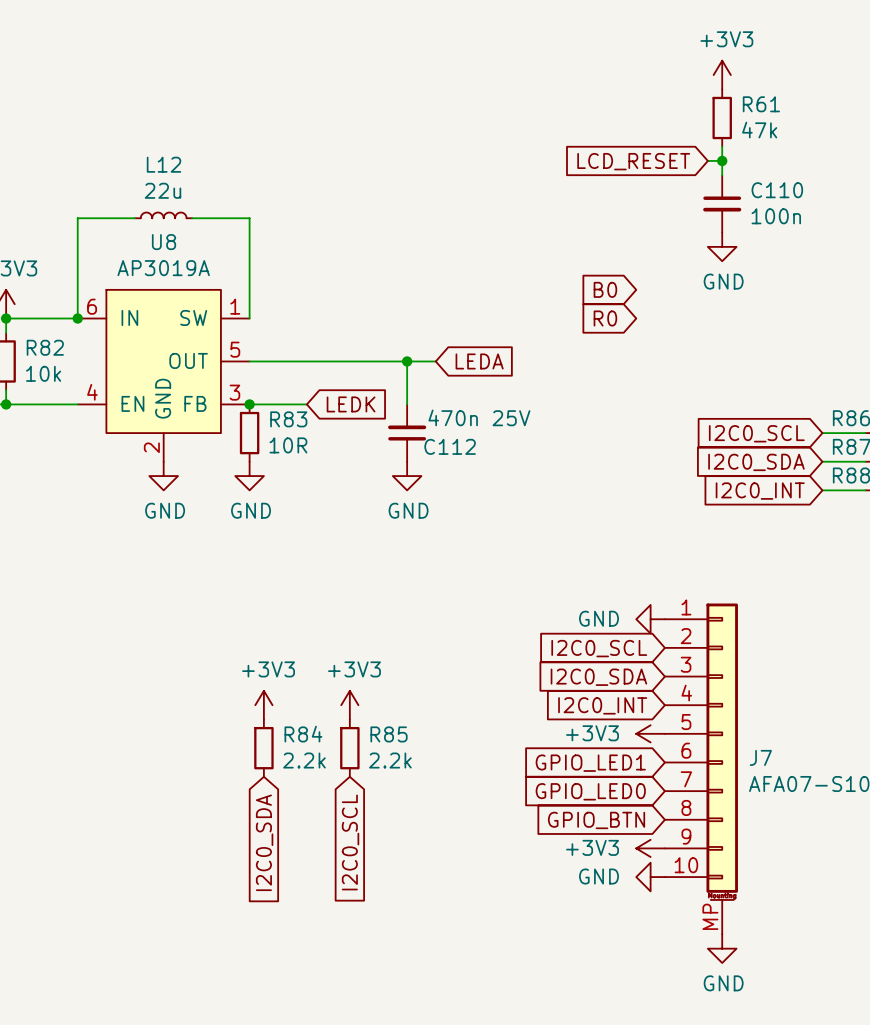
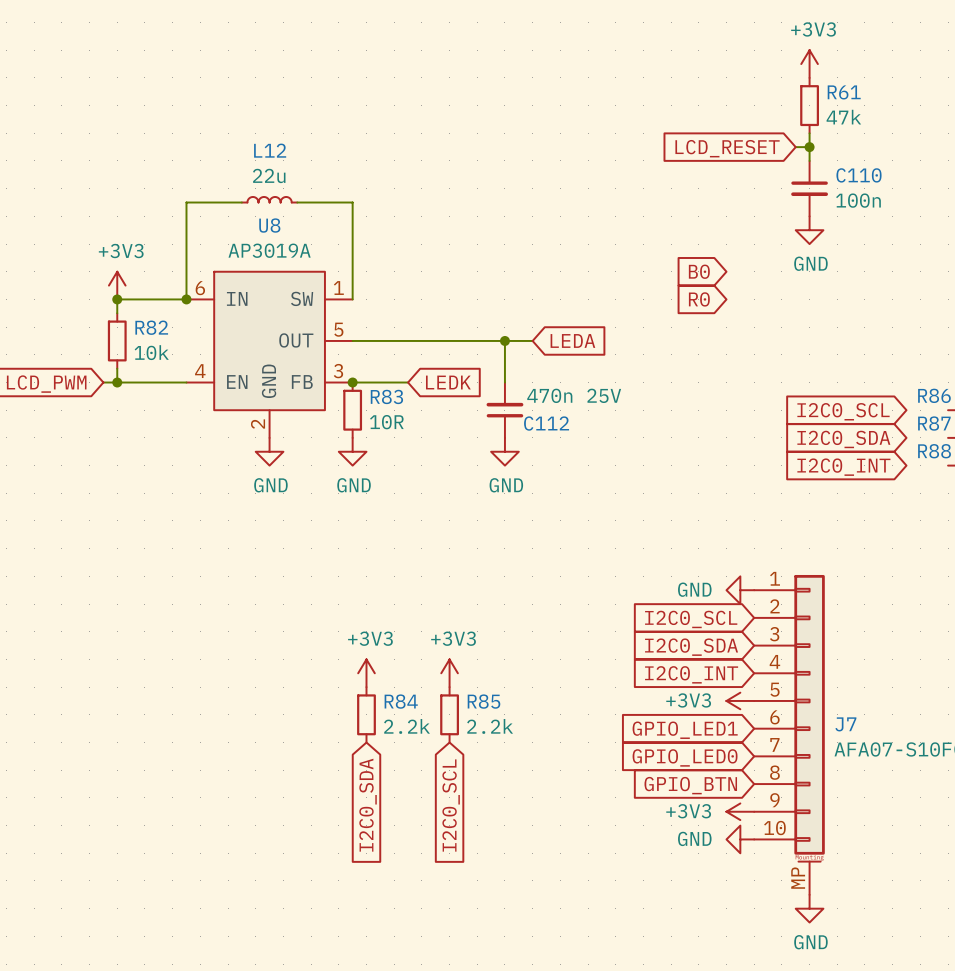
wire: (822, 433) (865, 433) -> none
wire: (822, 461) (865, 461) -> none
wire: (822, 490) (865, 490) -> none

